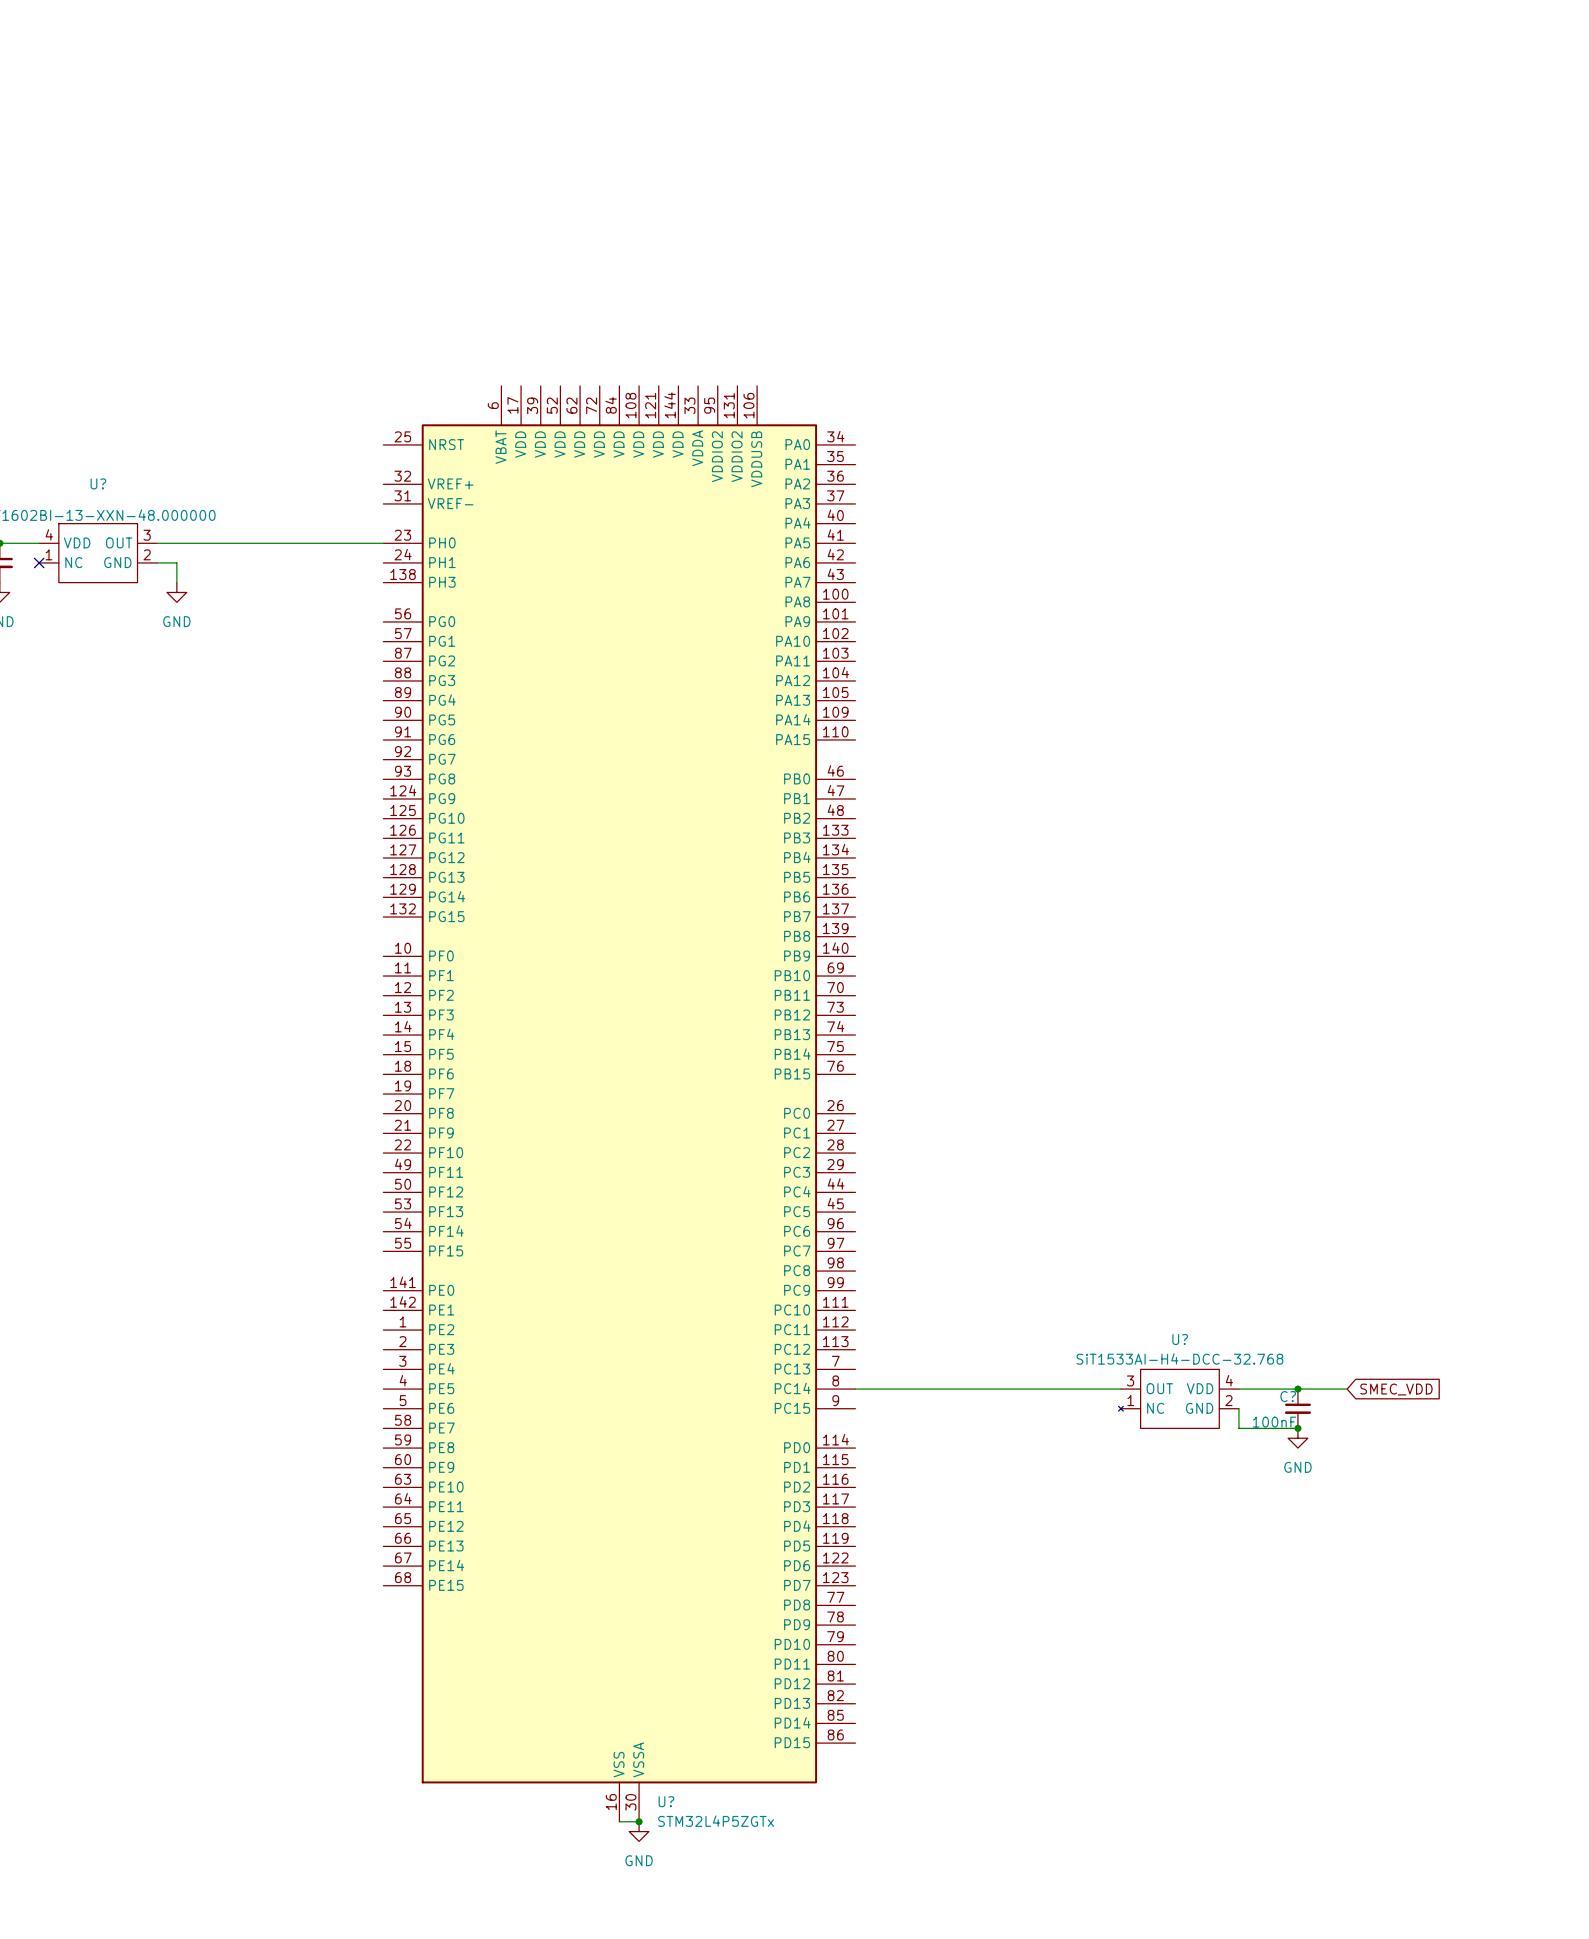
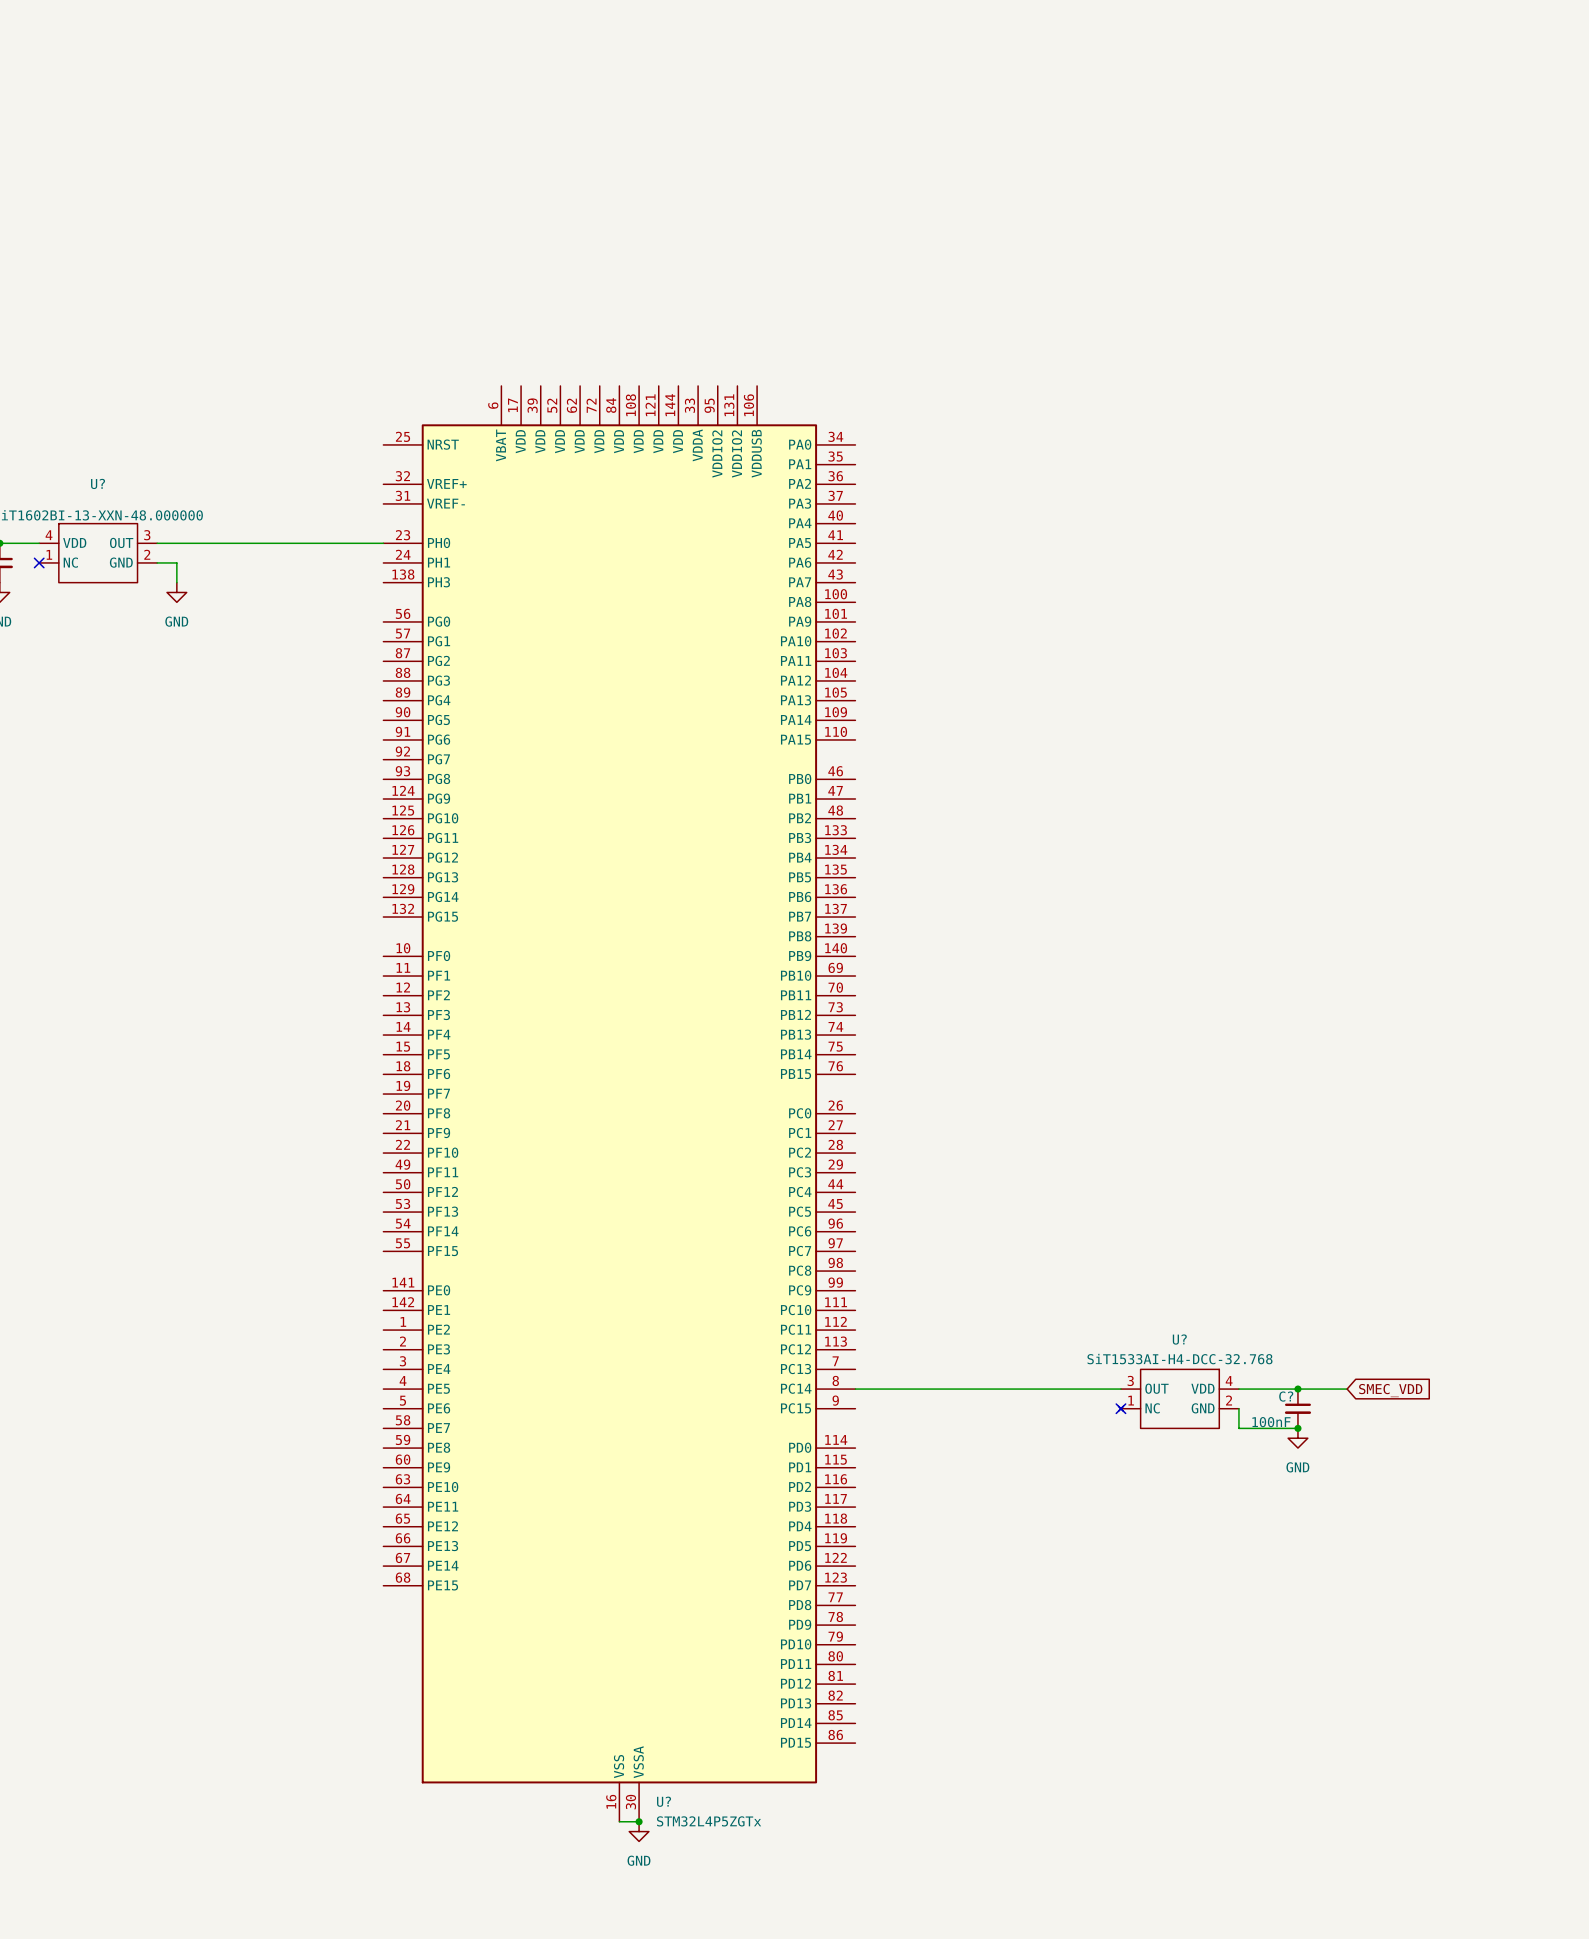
no-connect mark: none -> (1120, 1408)

